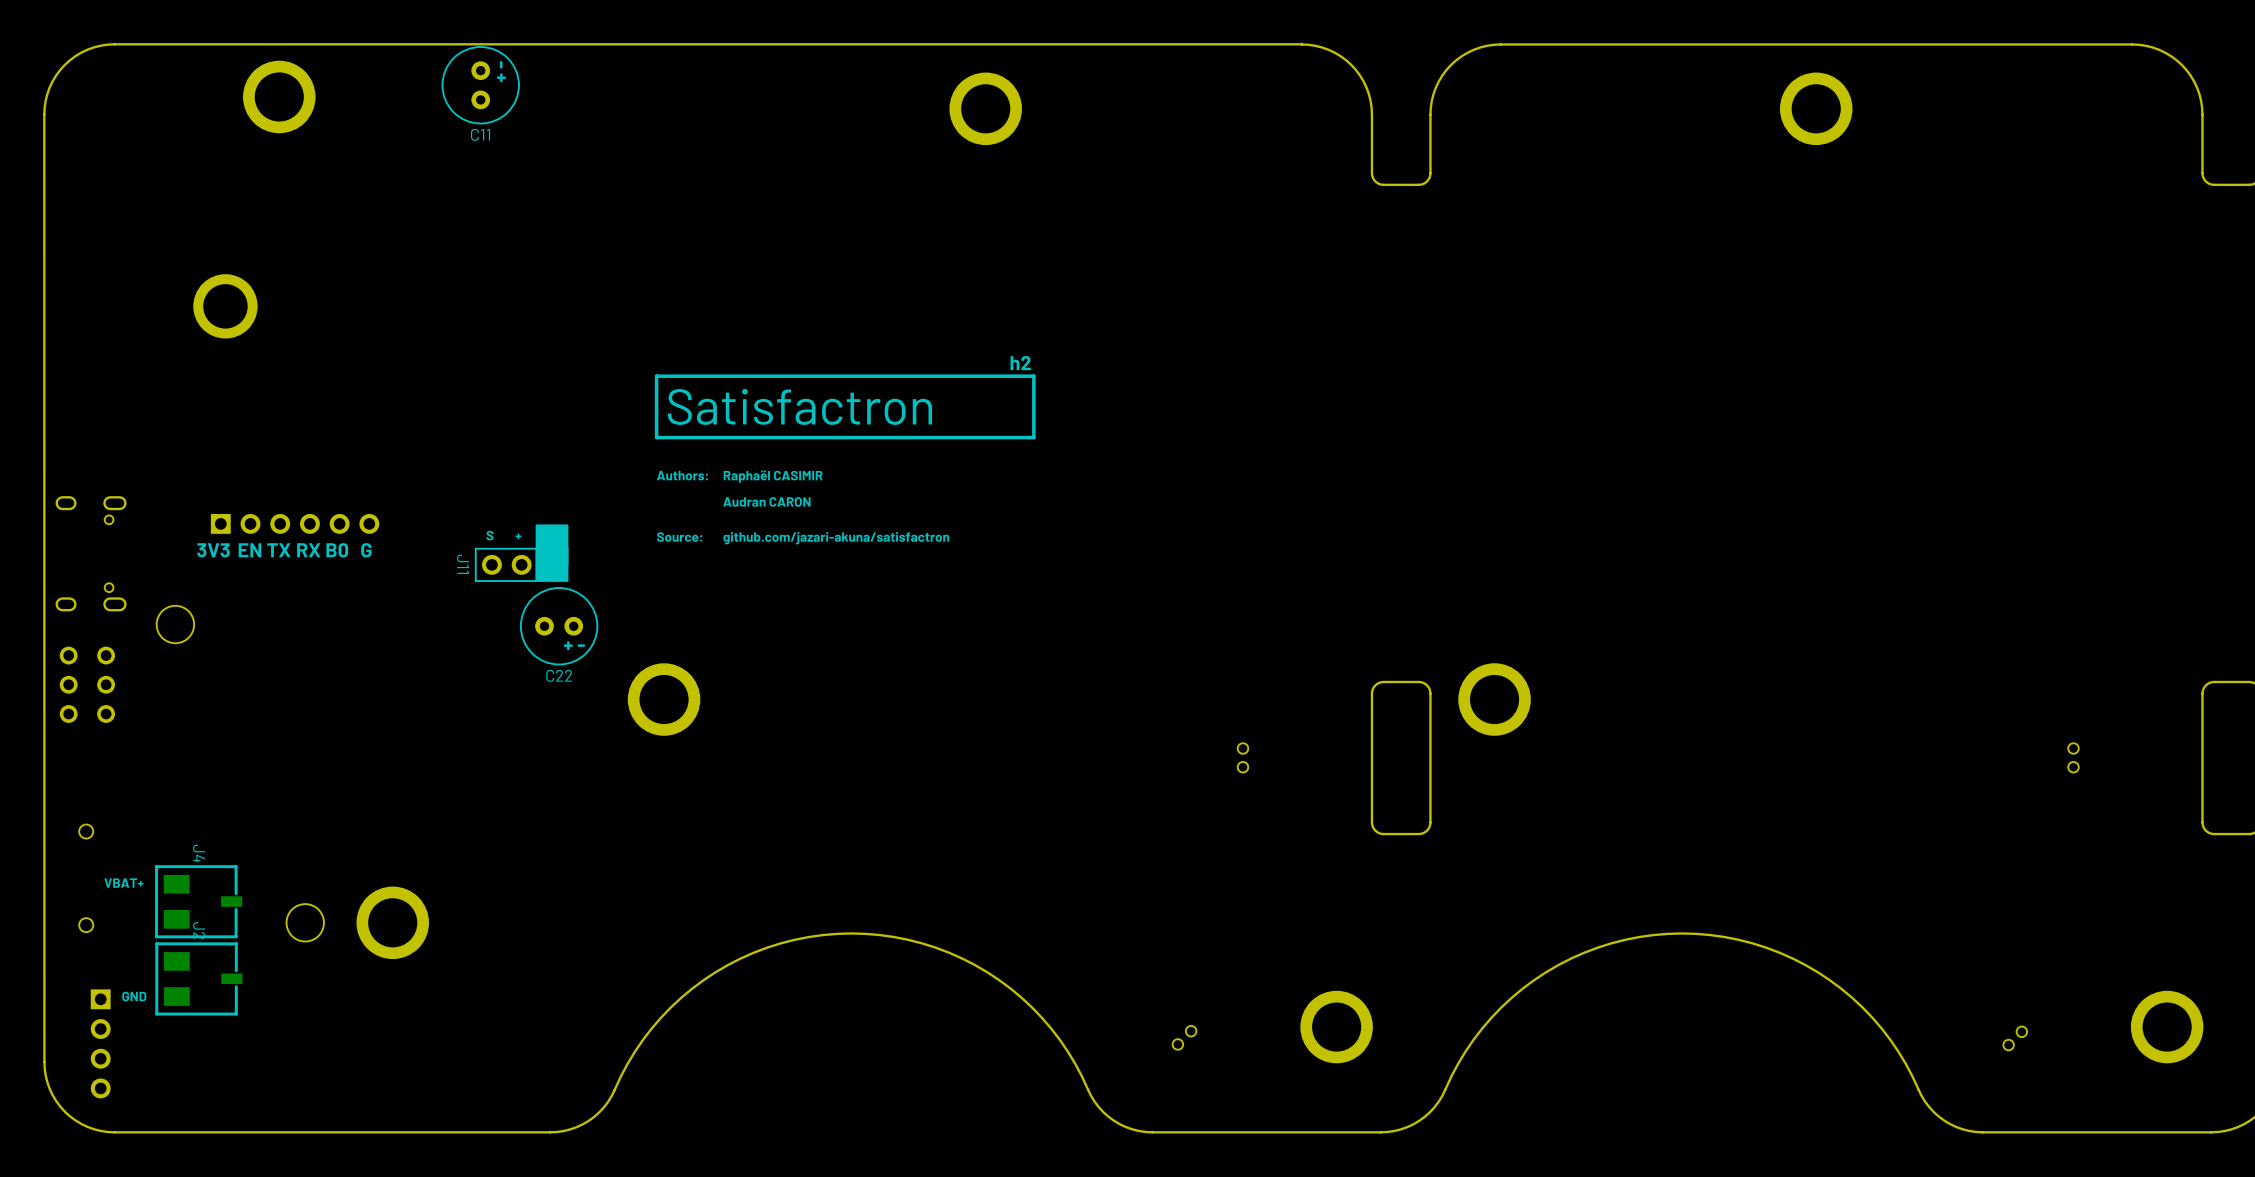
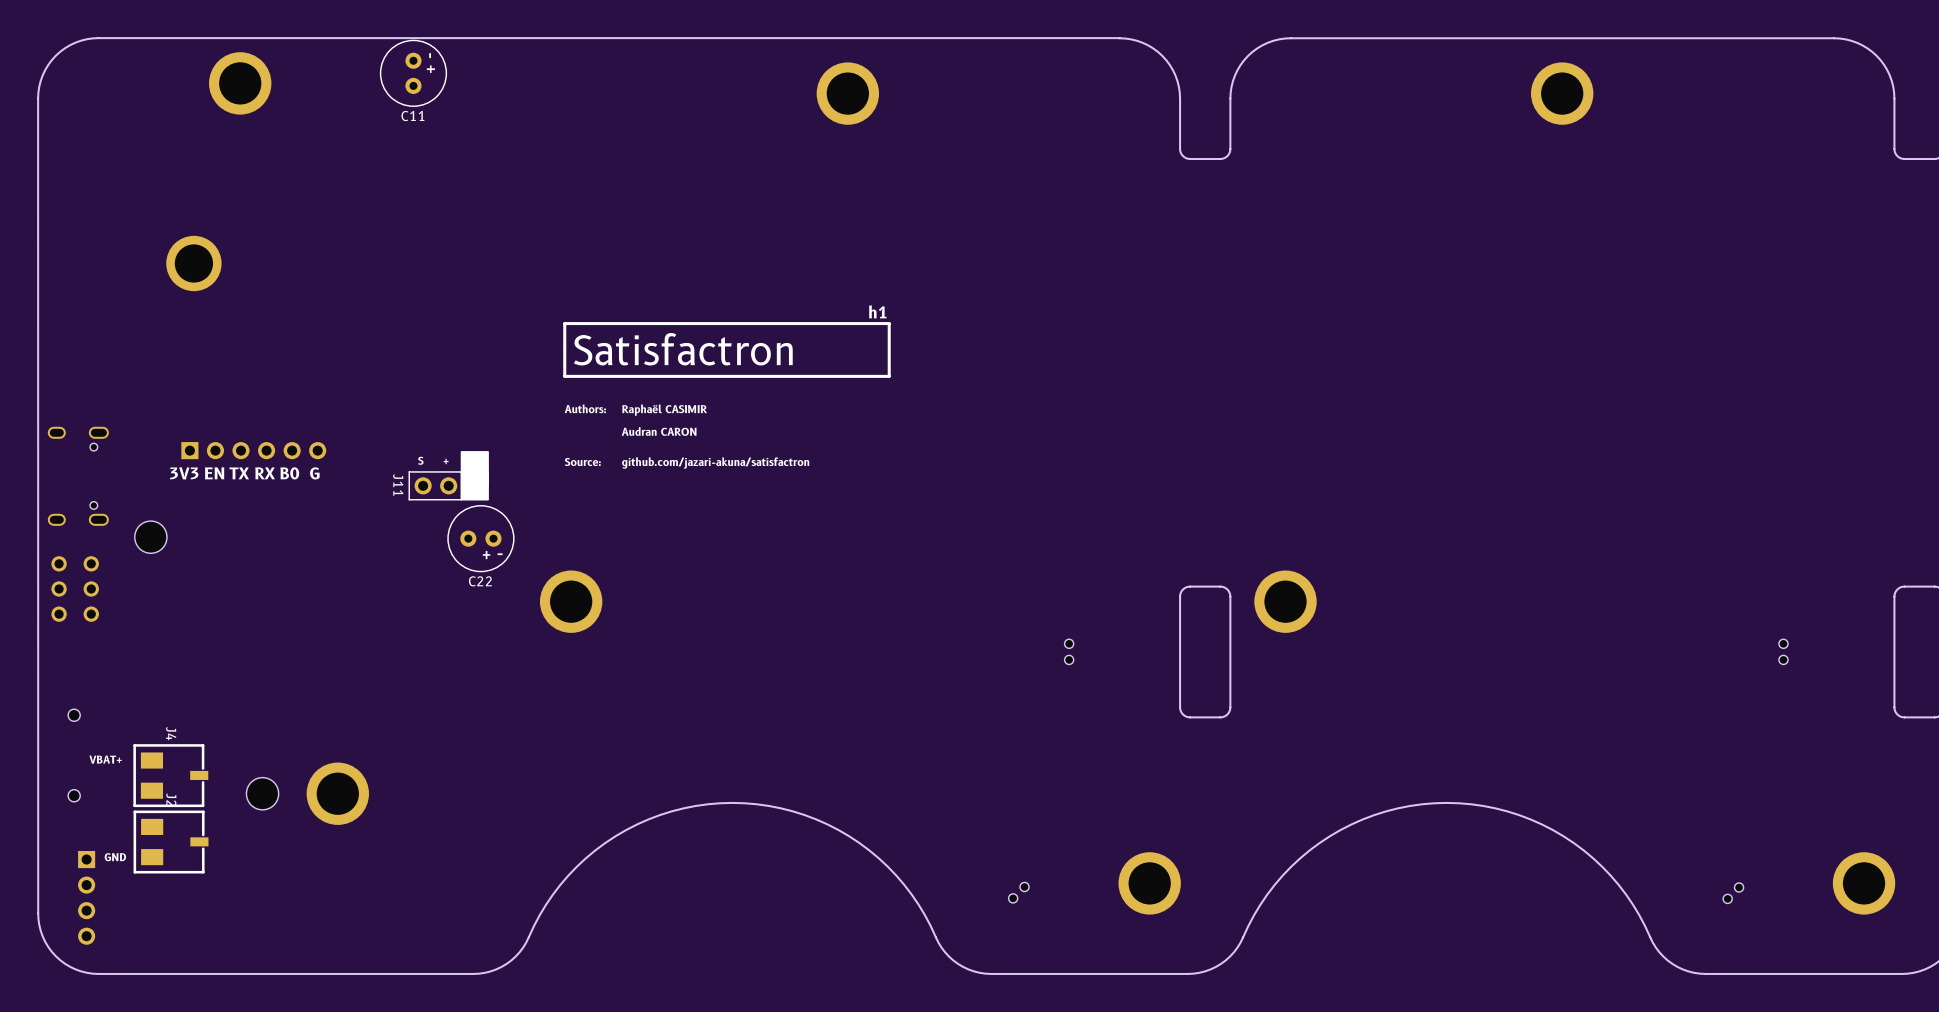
text: h2 (1020, 363) -> h1 (877, 311)

